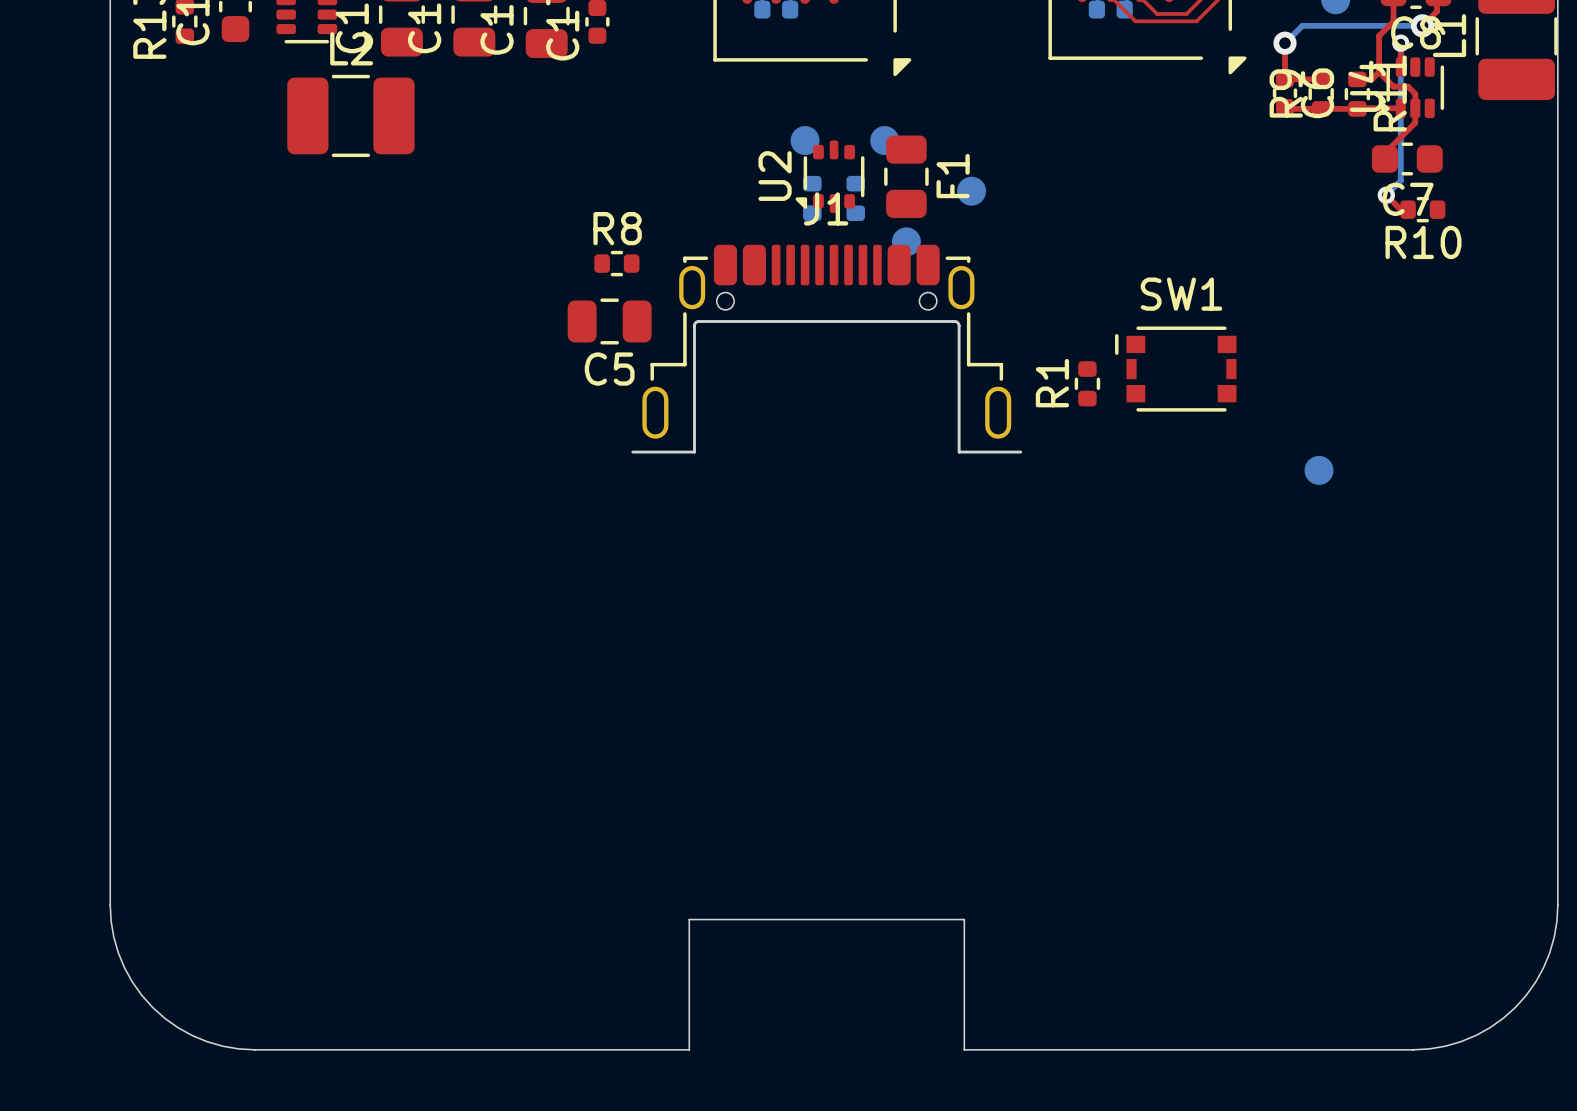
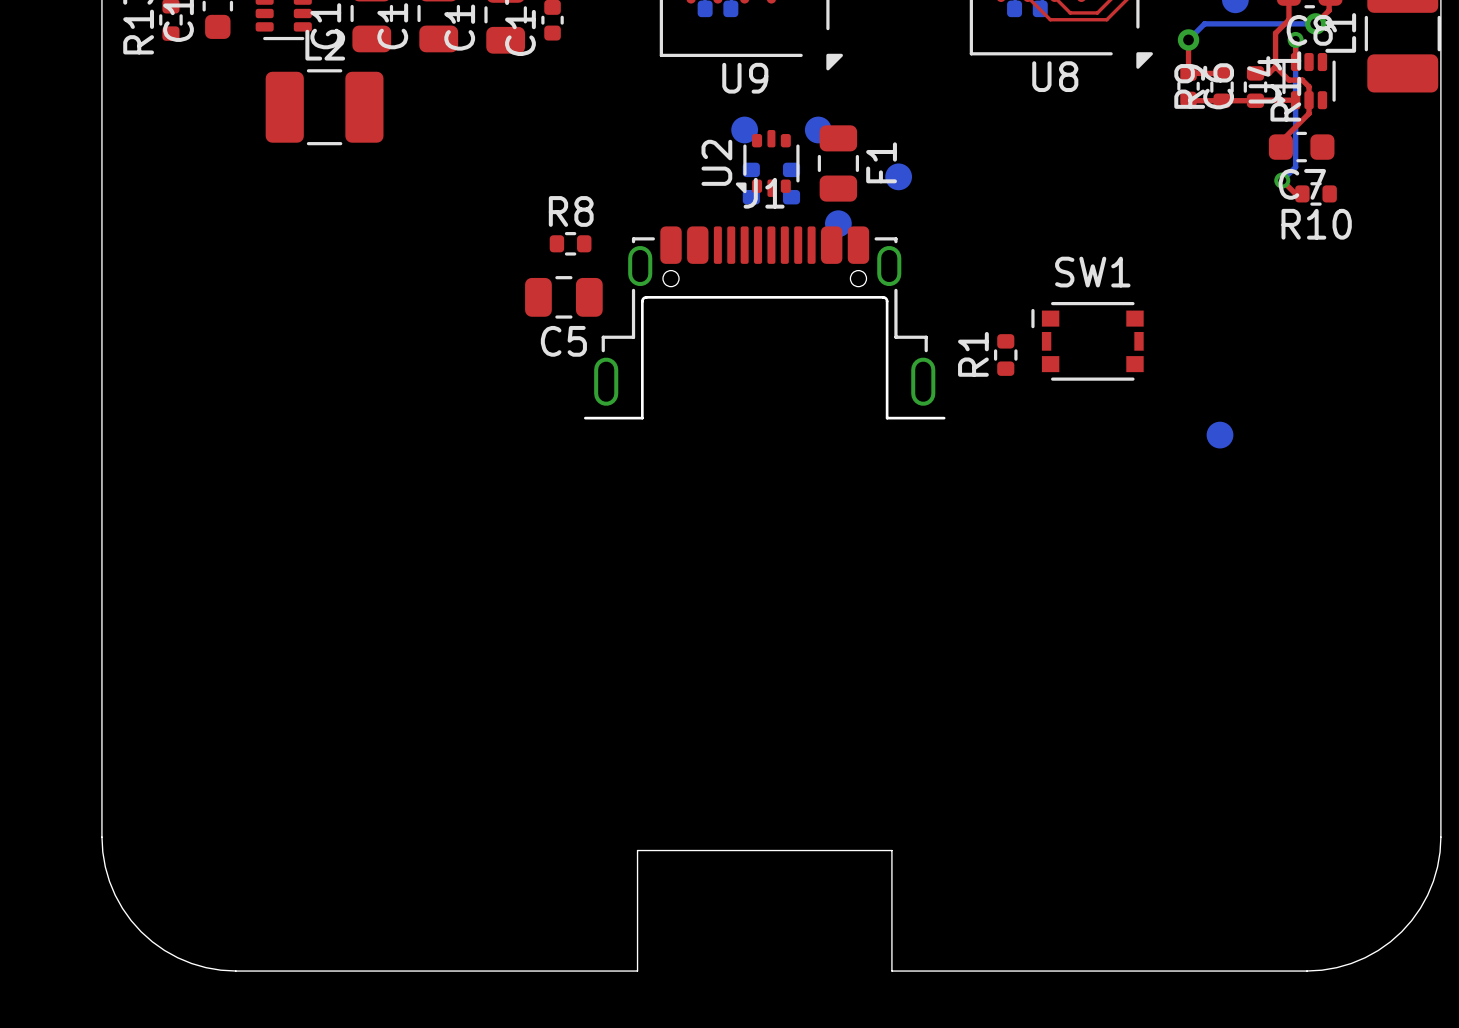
U8 name: none -> U8 (1055, 76)
U9 name: none -> U9 (745, 78)

